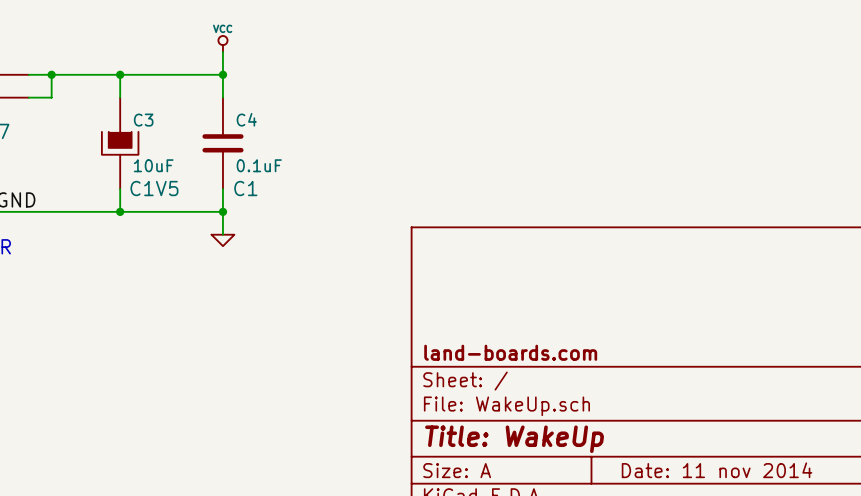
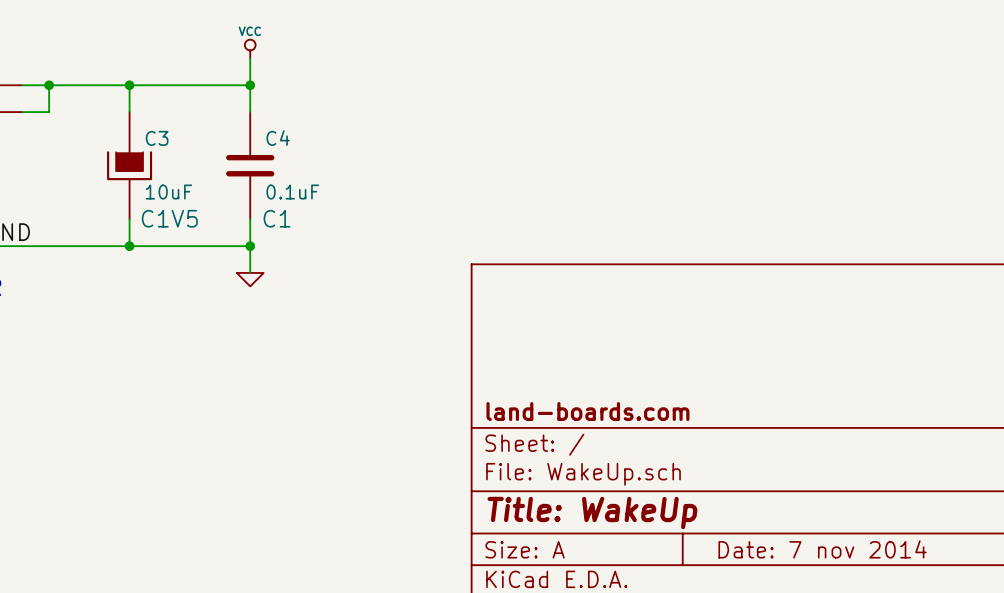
title block: Date: 11 nov 2014 (717, 470) -> Date: 7 nov 2014 (822, 549)

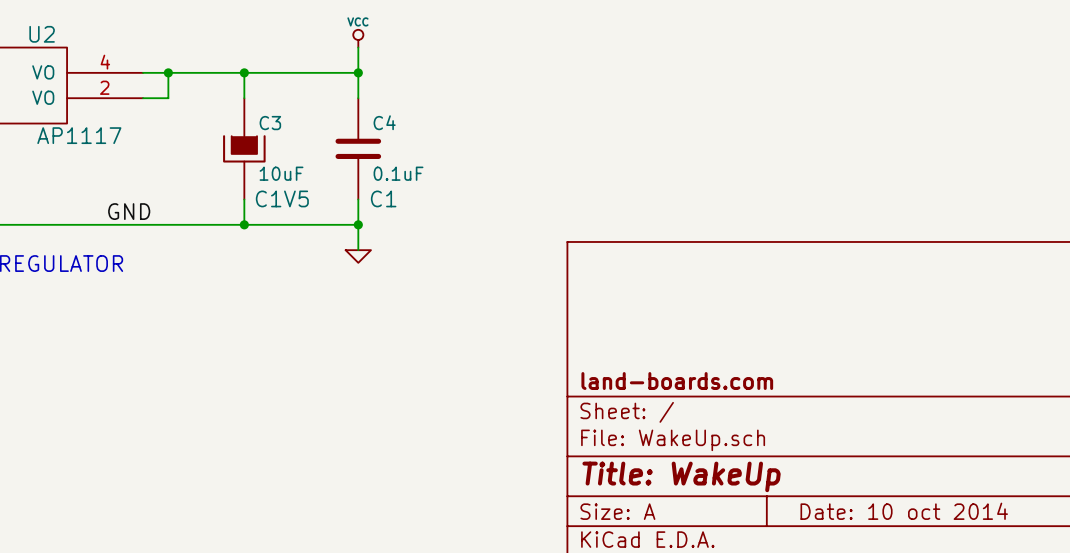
title block: Date: 7 nov 2014 (822, 549) -> Date: 10 oct 2014 (904, 511)

